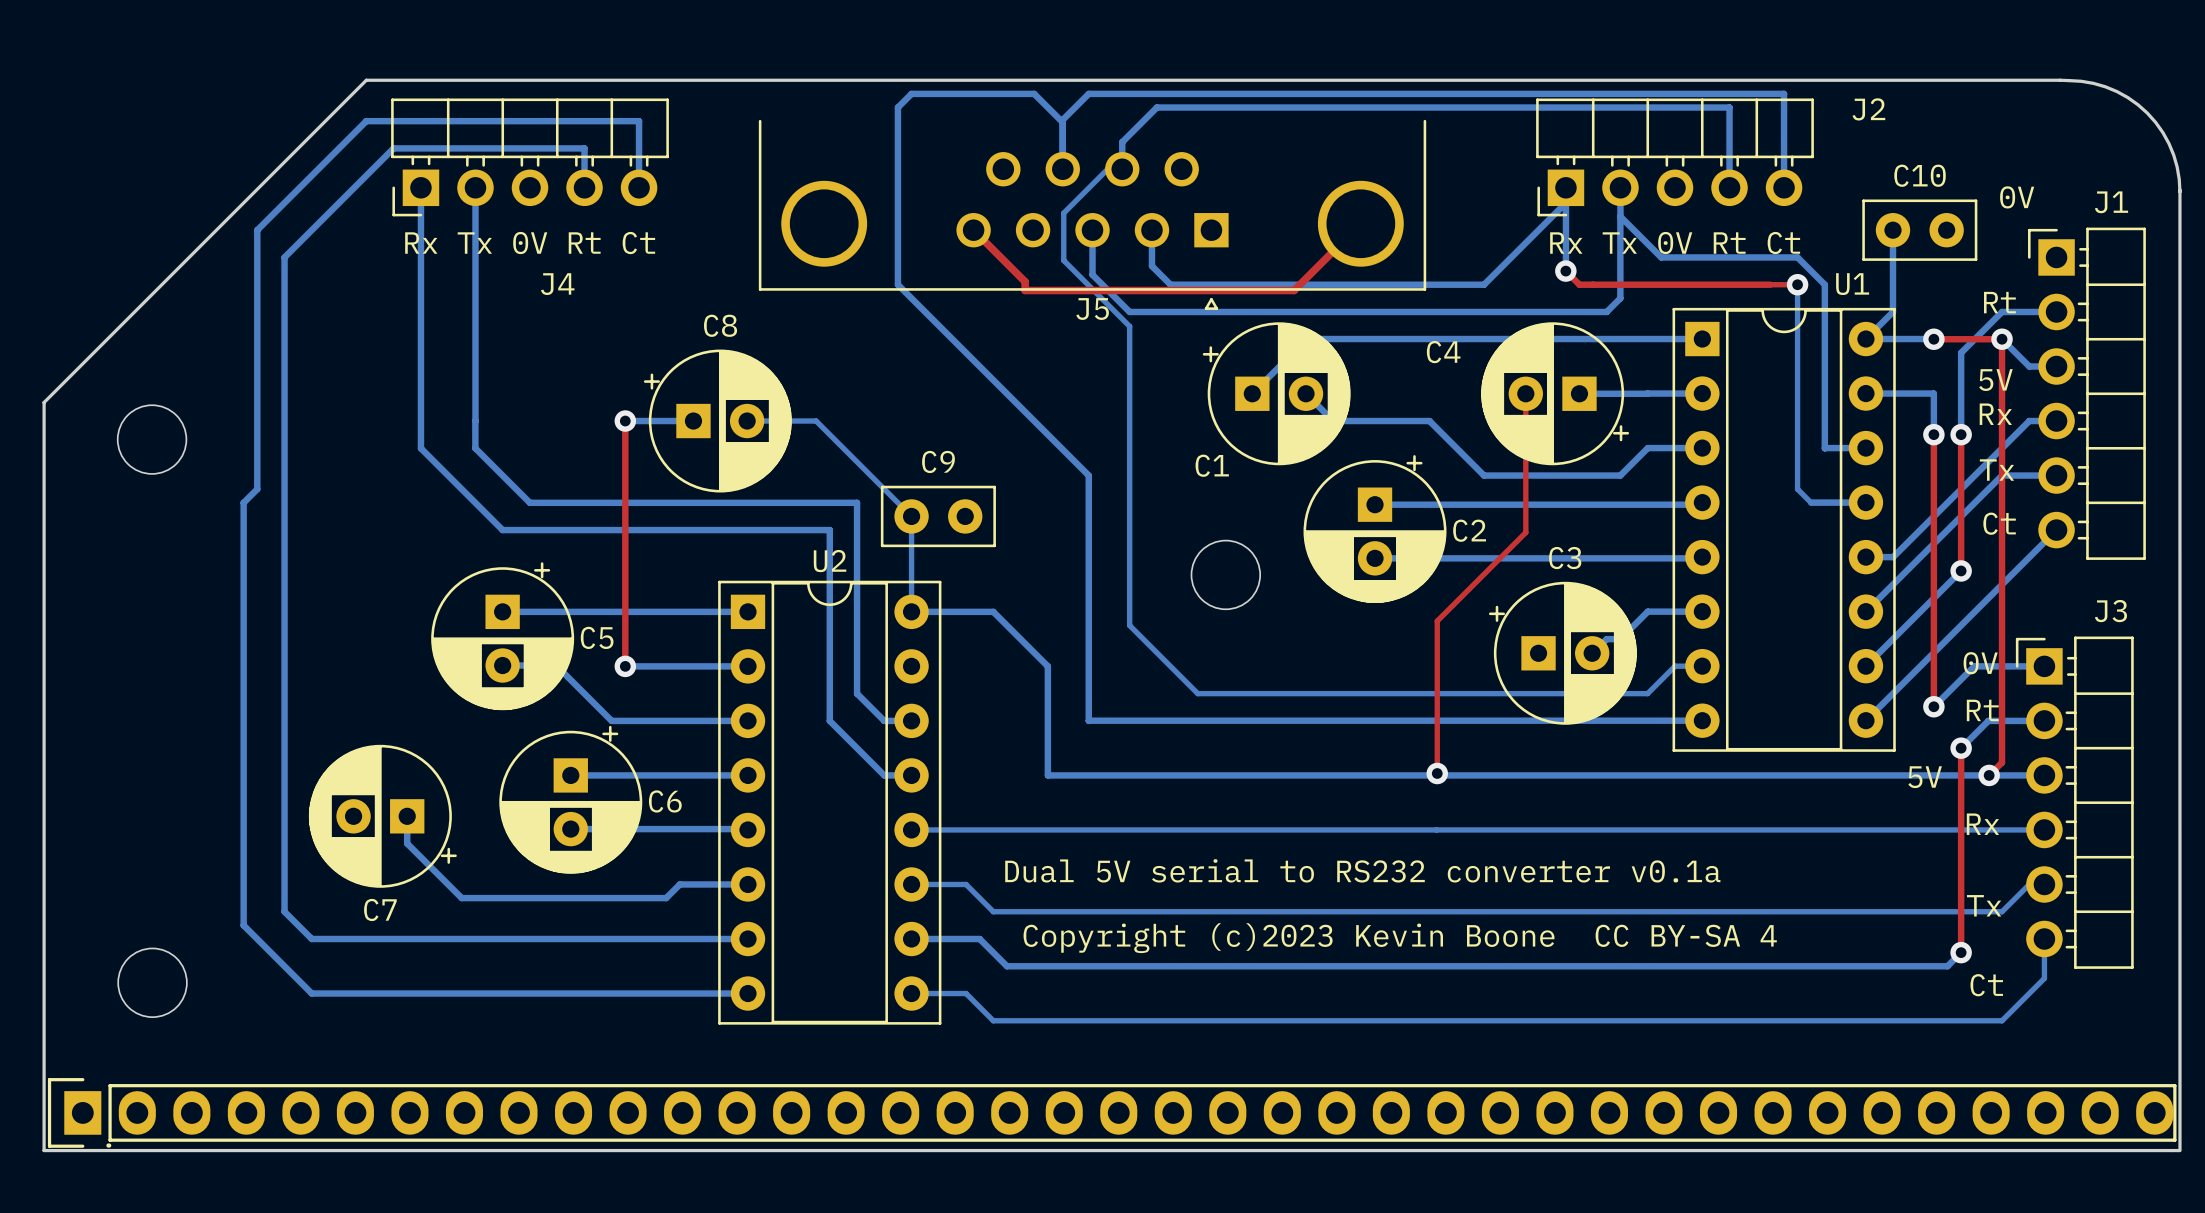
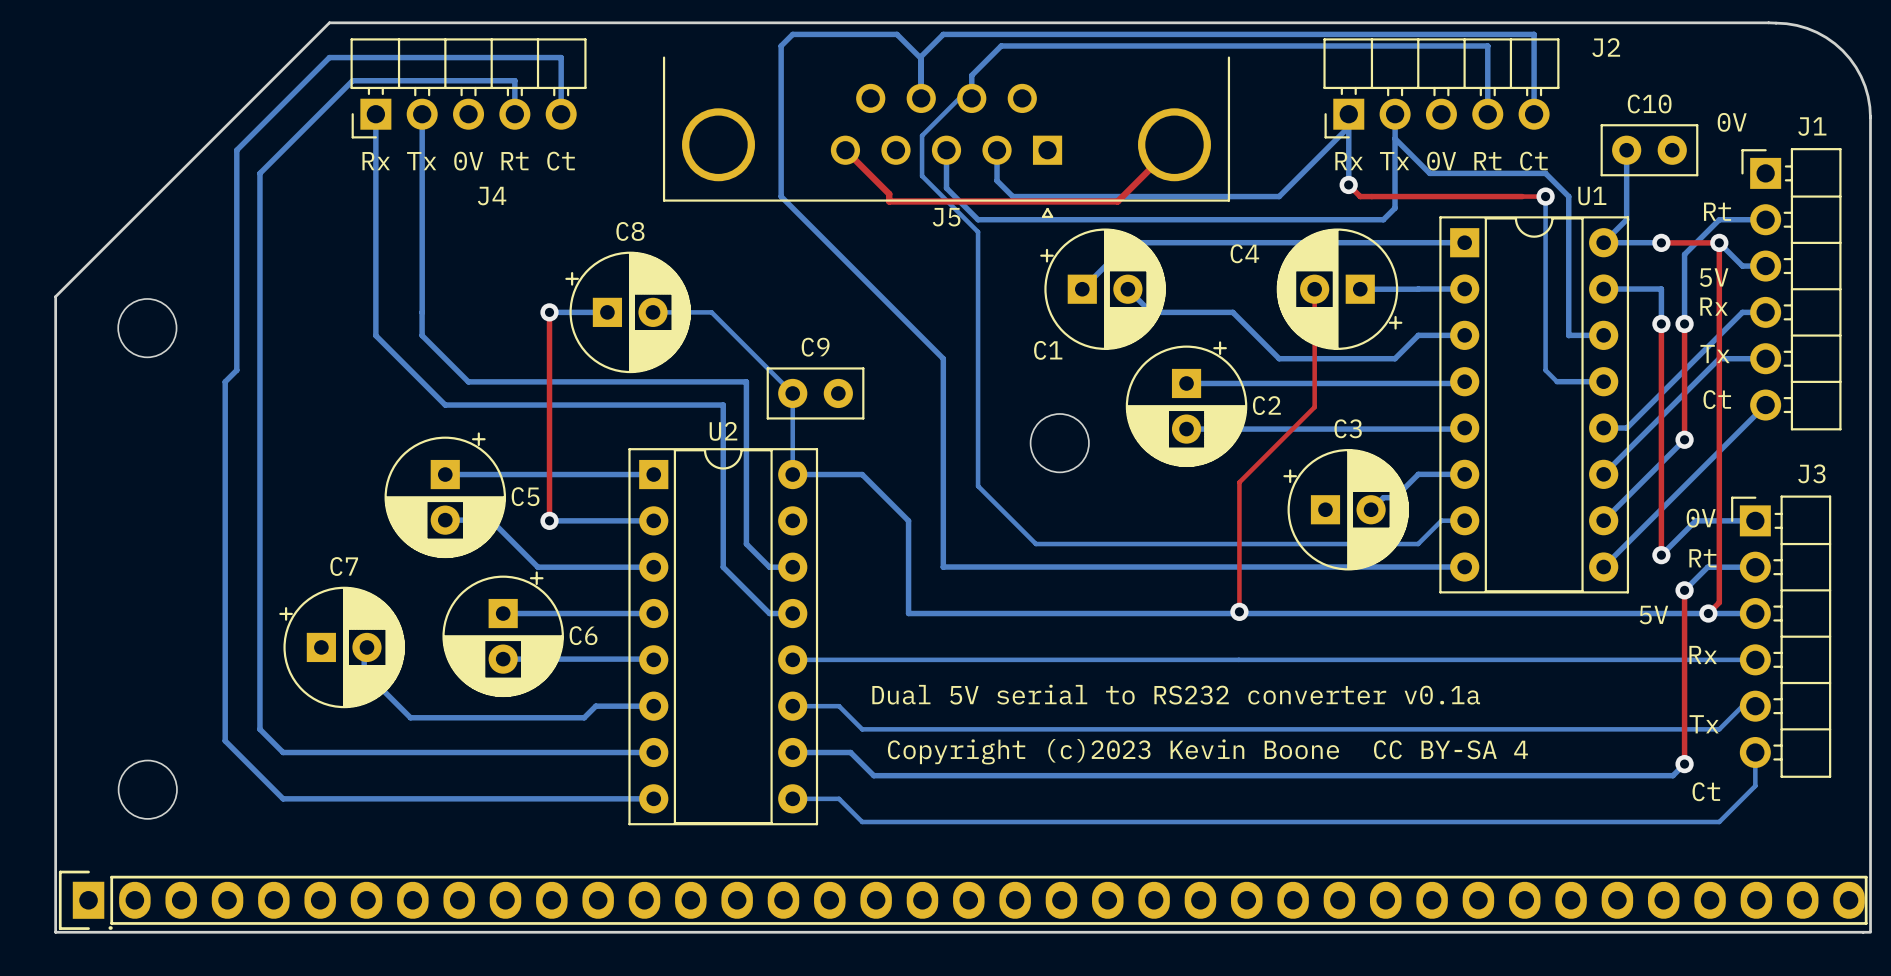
C7 rotation: 0° (382, 816) -> 180° (342, 647)

